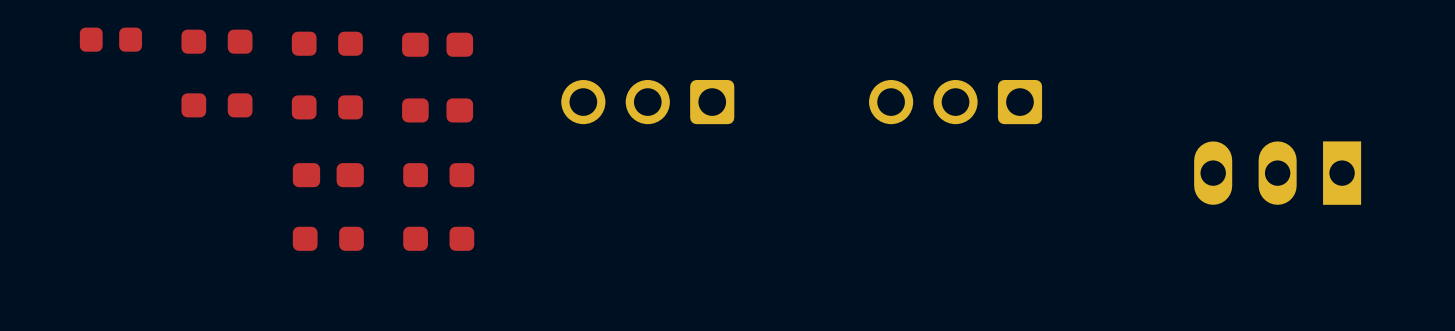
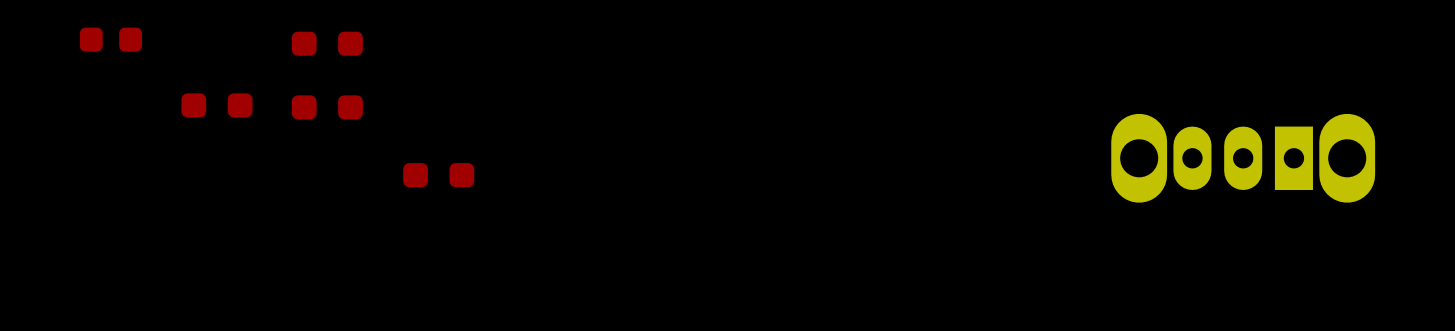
part: (216, 41) -> none
part: (437, 44) -> none
part: (647, 102) -> none
part: (955, 102) -> none
part: (437, 110) -> none
part: none -> (1243, 158)
part: (1277, 173) -> none
part: (328, 175) -> none
part: (328, 238) -> none
part: (438, 238) -> none

